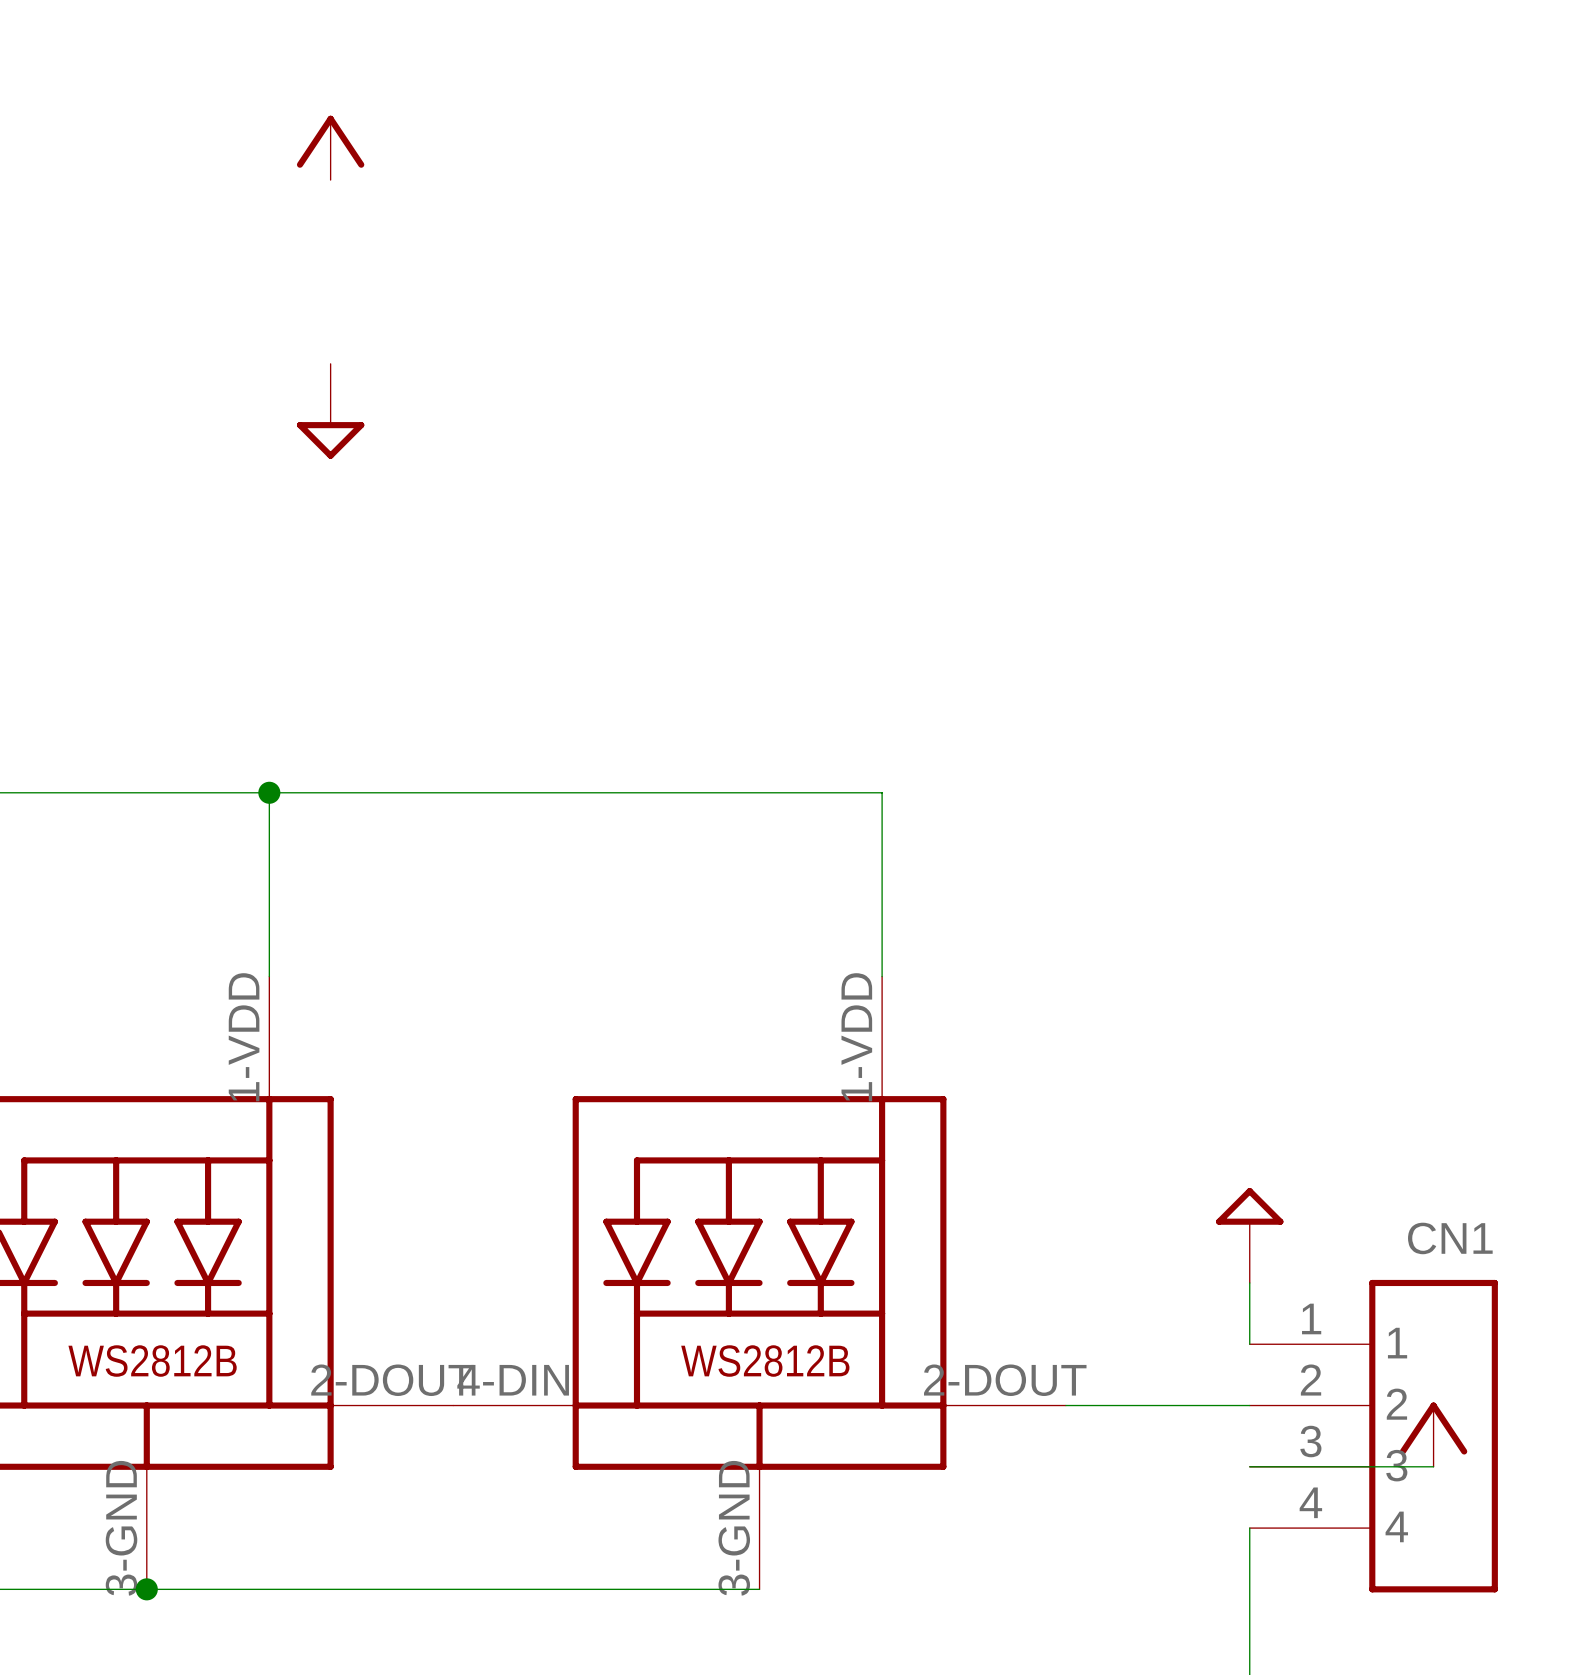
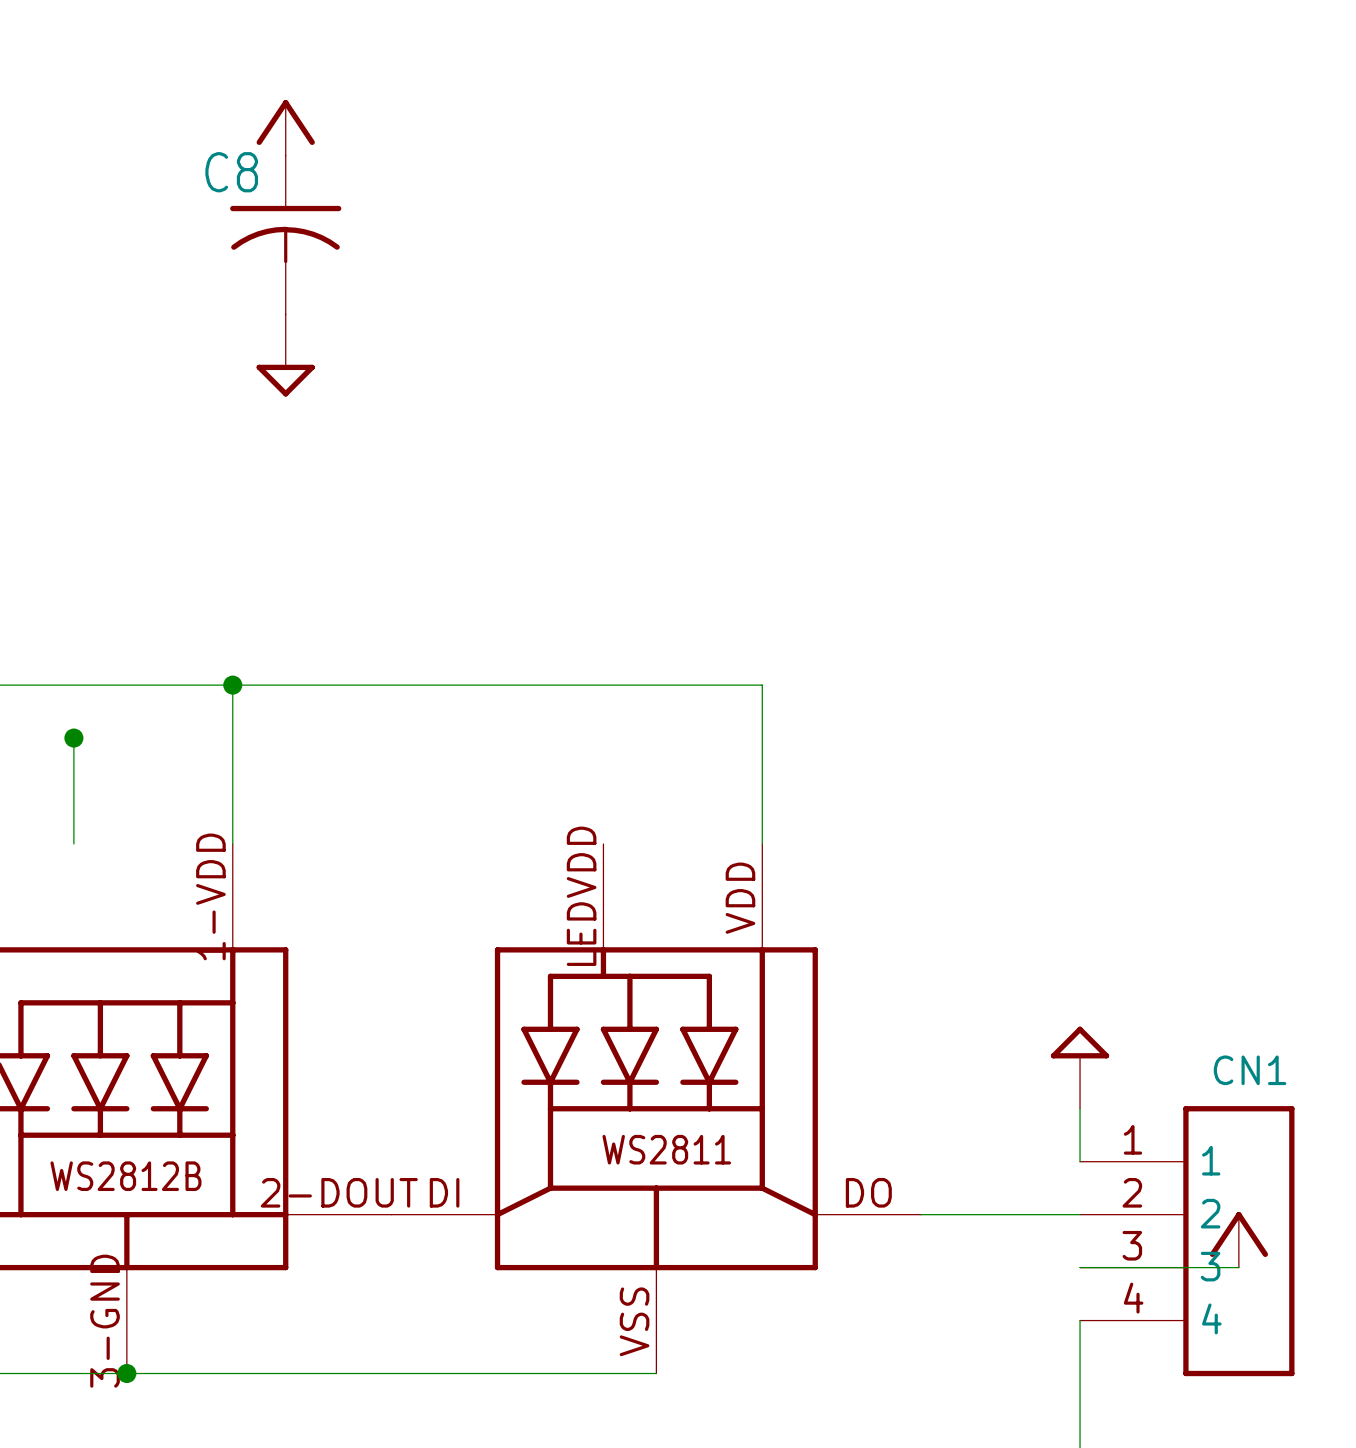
C8: none -> (285, 235)
wire: none -> (73, 738) (73, 843)
junction: none -> (73, 738)
part symbol: [453, 976, 1066, 1590] -> [391, 843, 922, 1374]

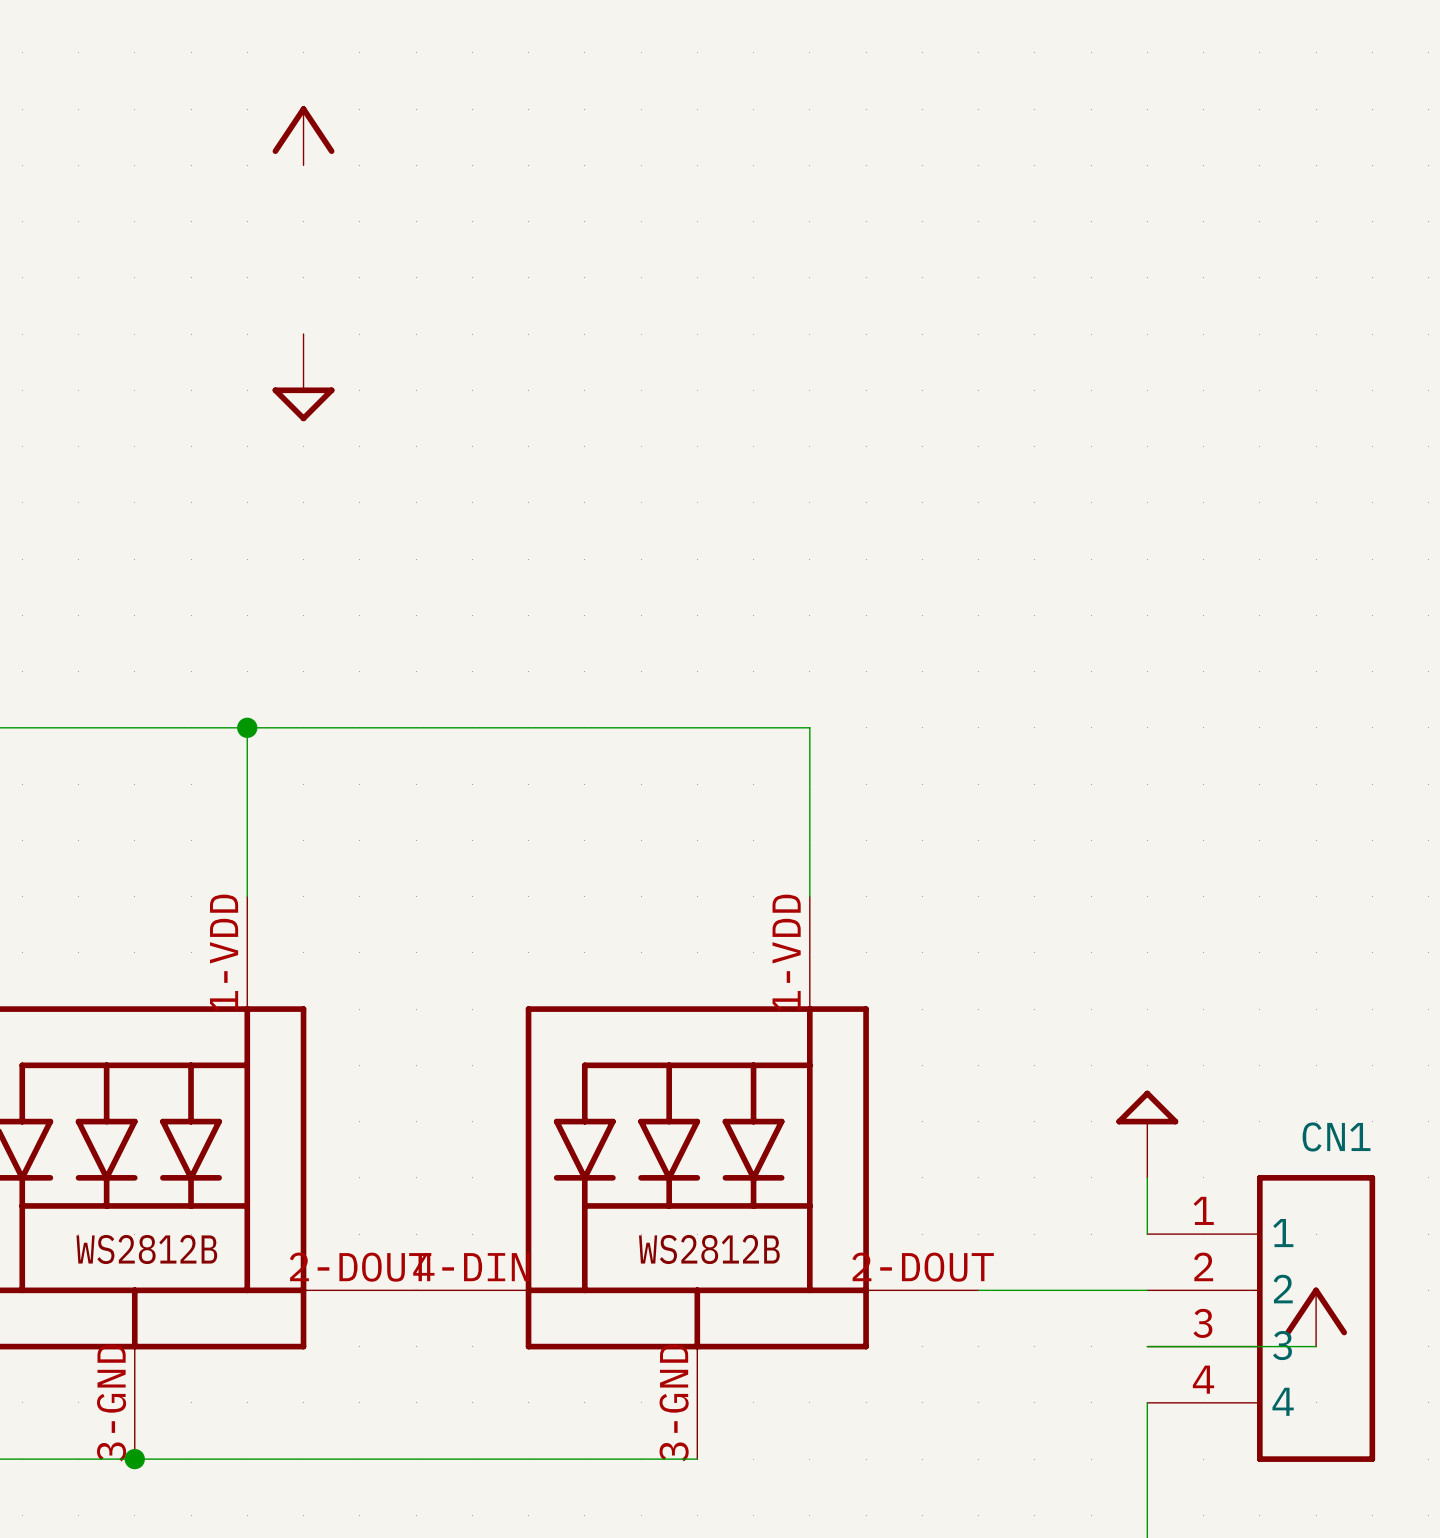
C8: (285, 235) -> none
wire: (73, 738) (73, 843) -> none
junction: (73, 738) -> none
part symbol: [391, 843, 922, 1374] -> [416, 896, 979, 1460]

